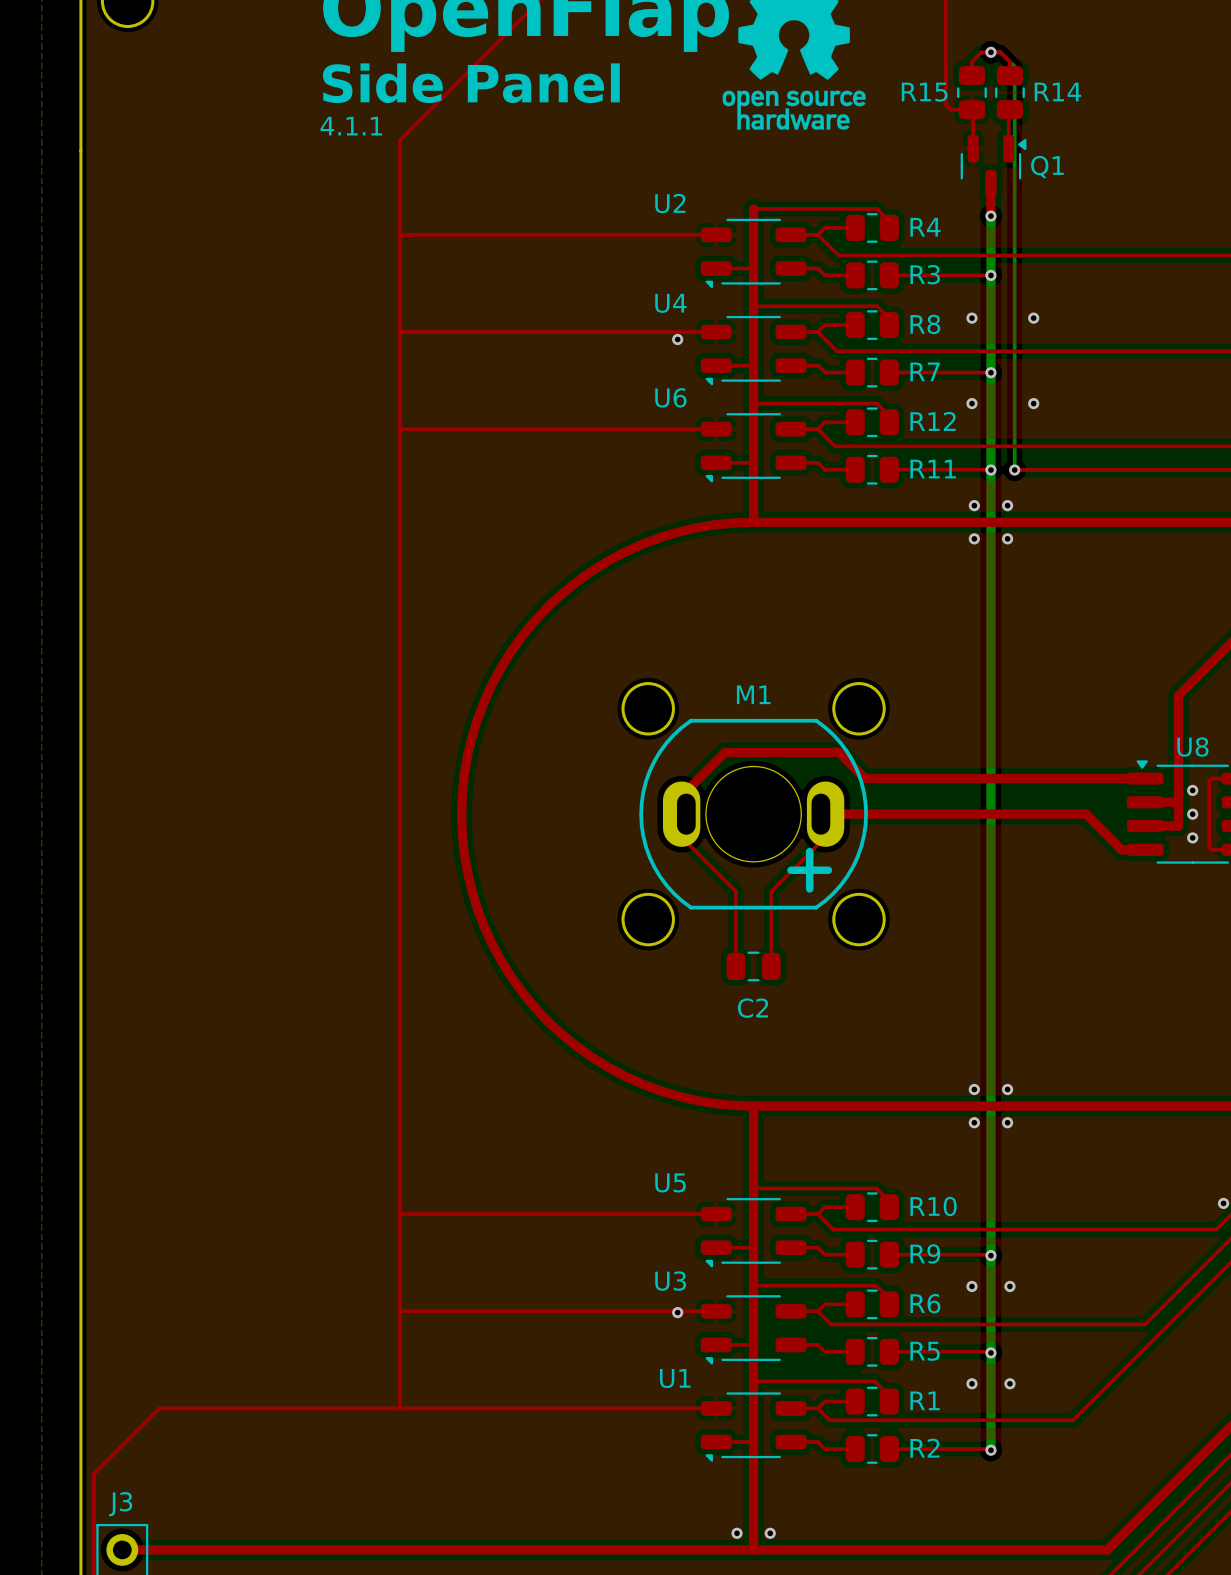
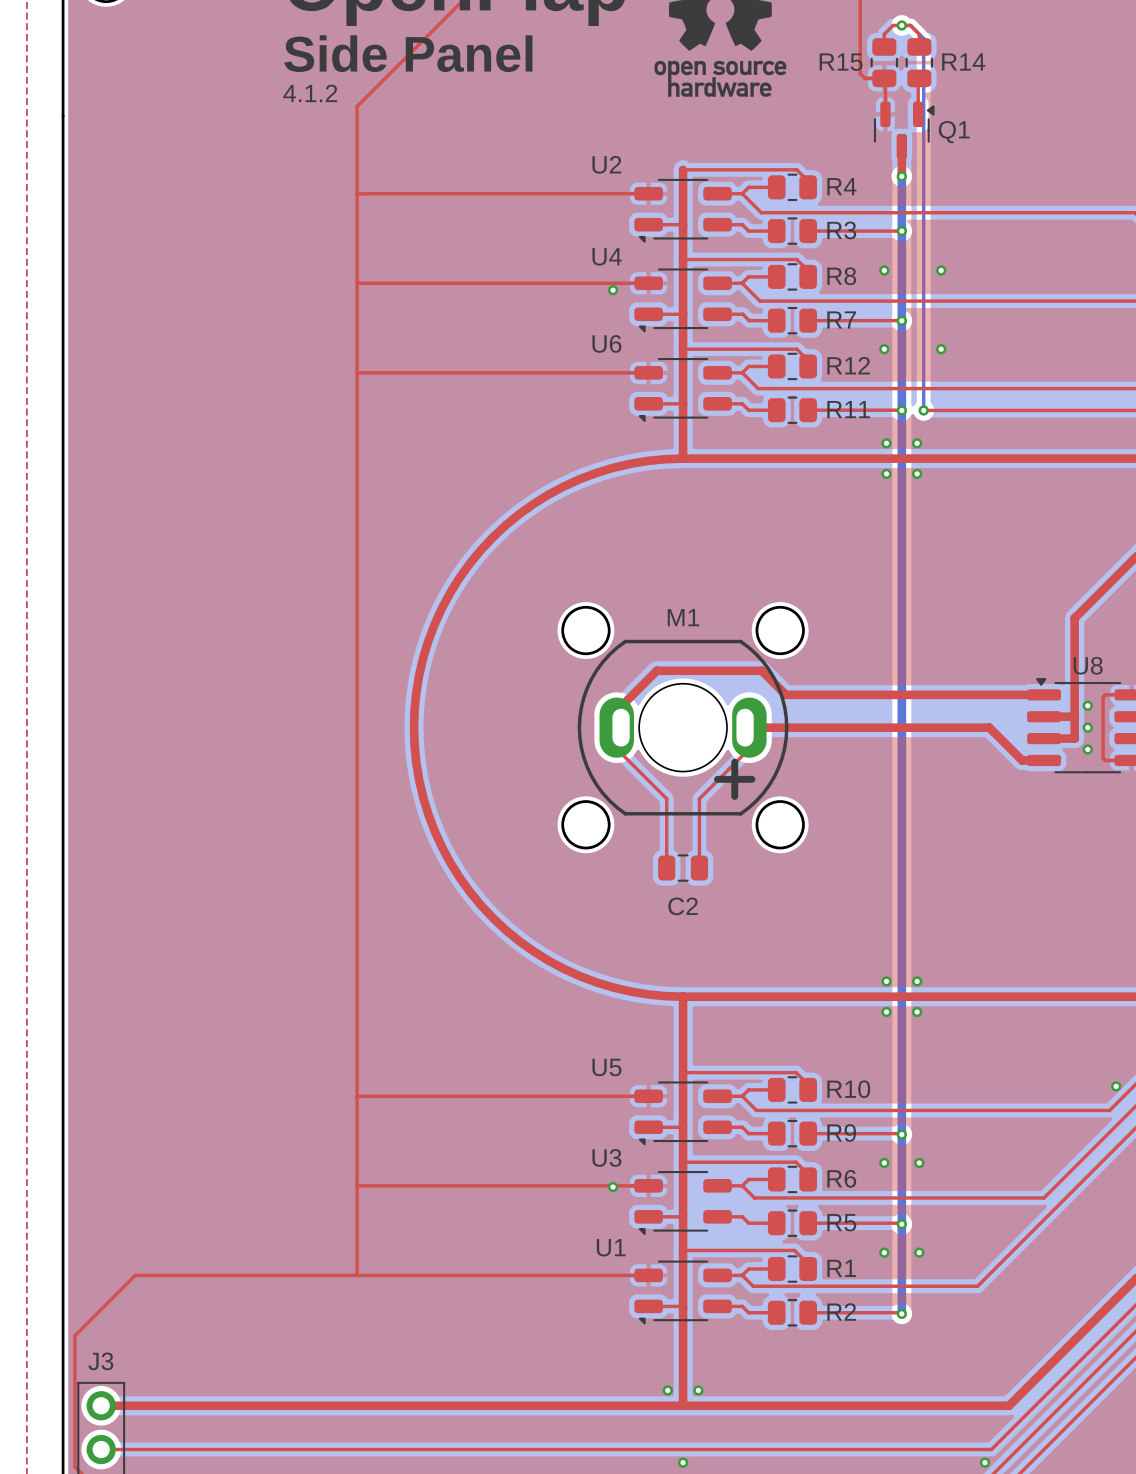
text: 4.1.1 (351, 126) -> 4.1.2 (310, 93)

